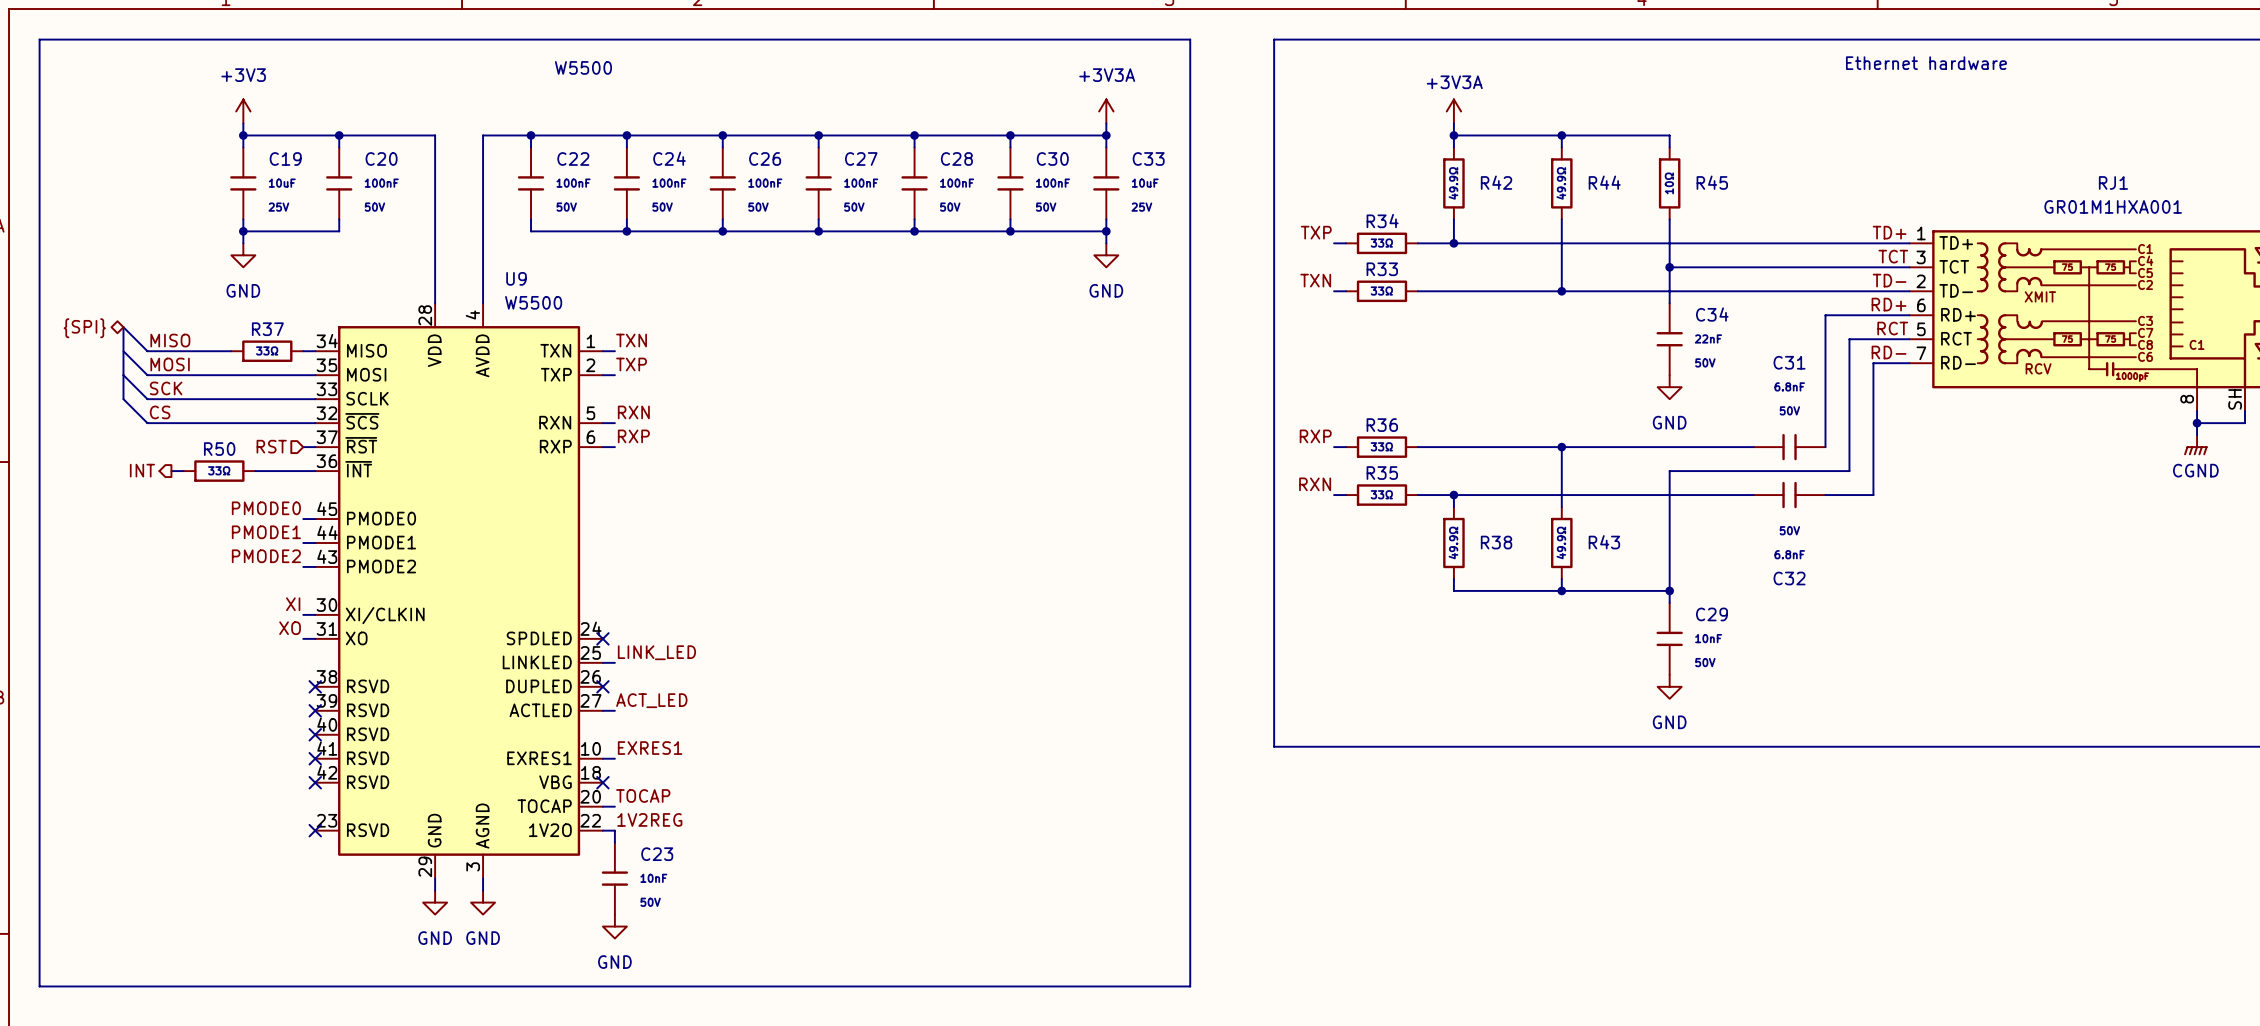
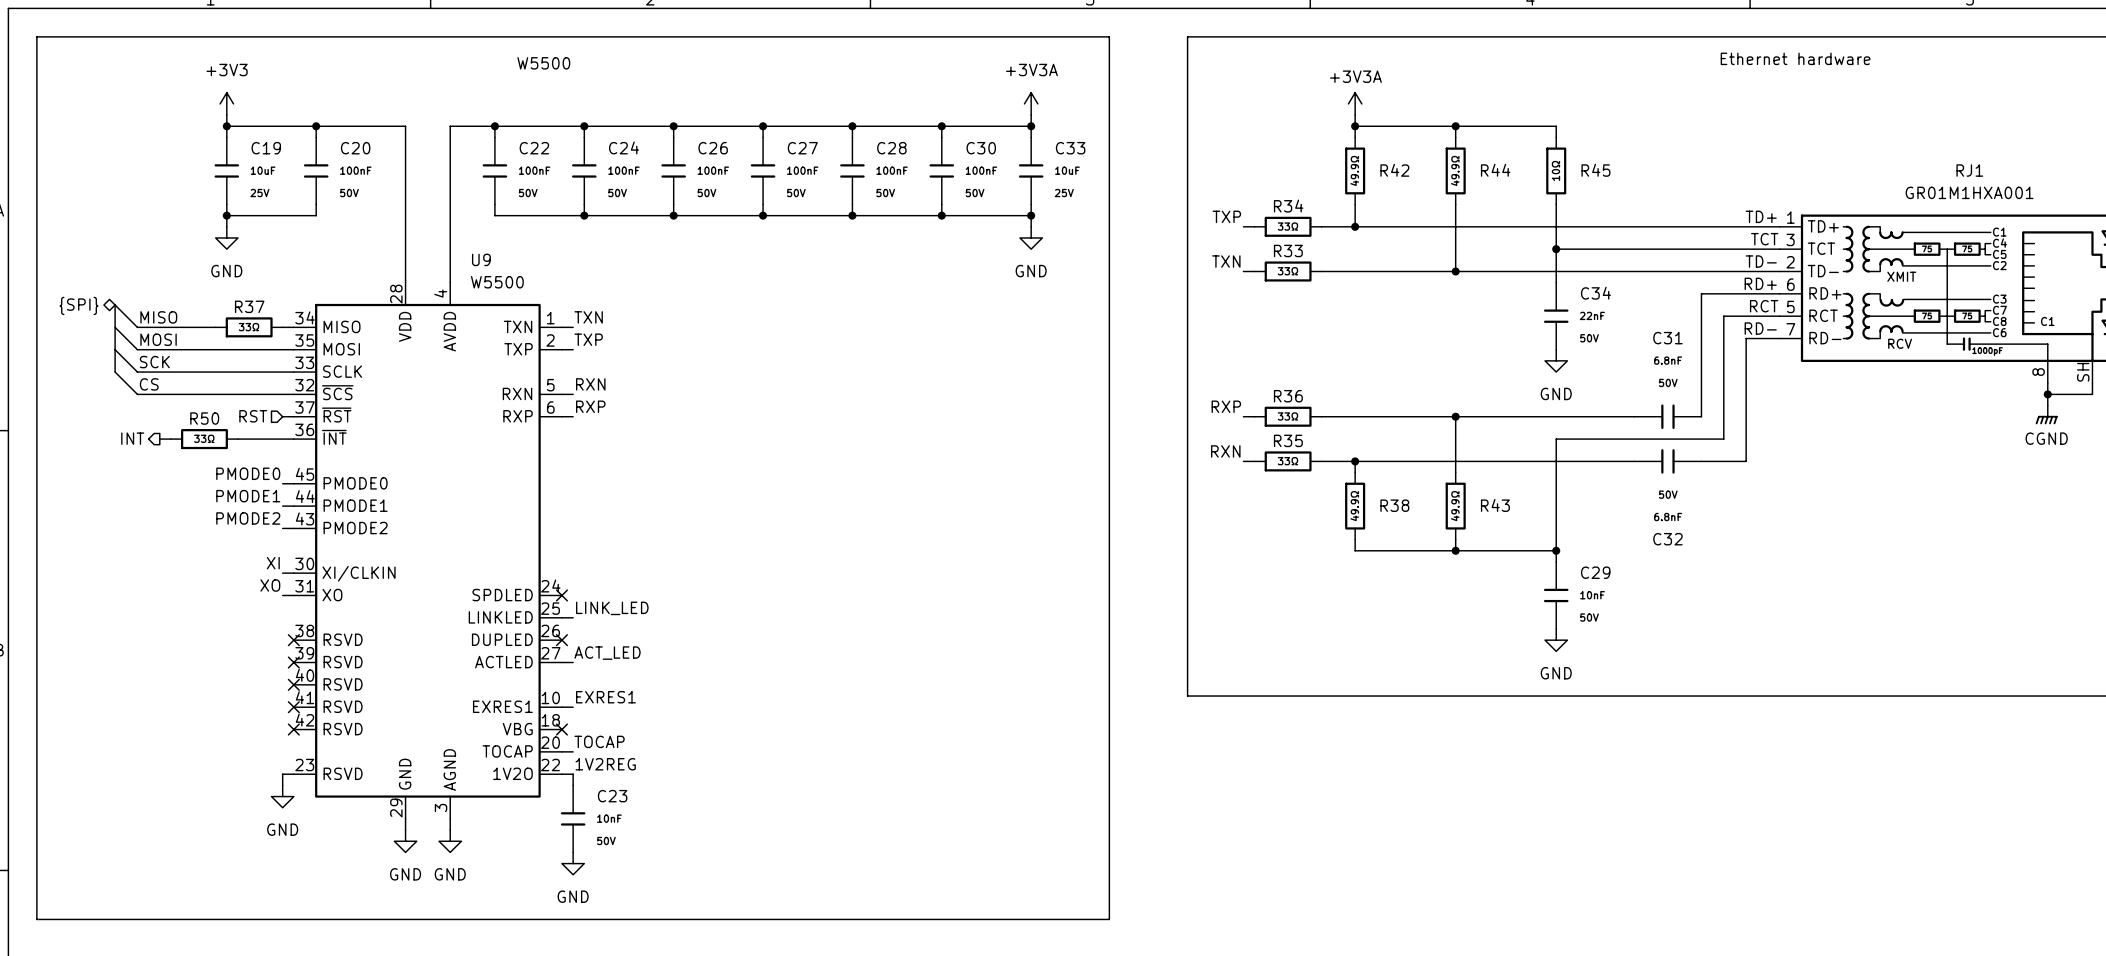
wire: none -> (293, 774) (282, 774) (282, 785)
no-connect mark: (315, 830) -> none
power symbol: none -> GND (282, 796)

